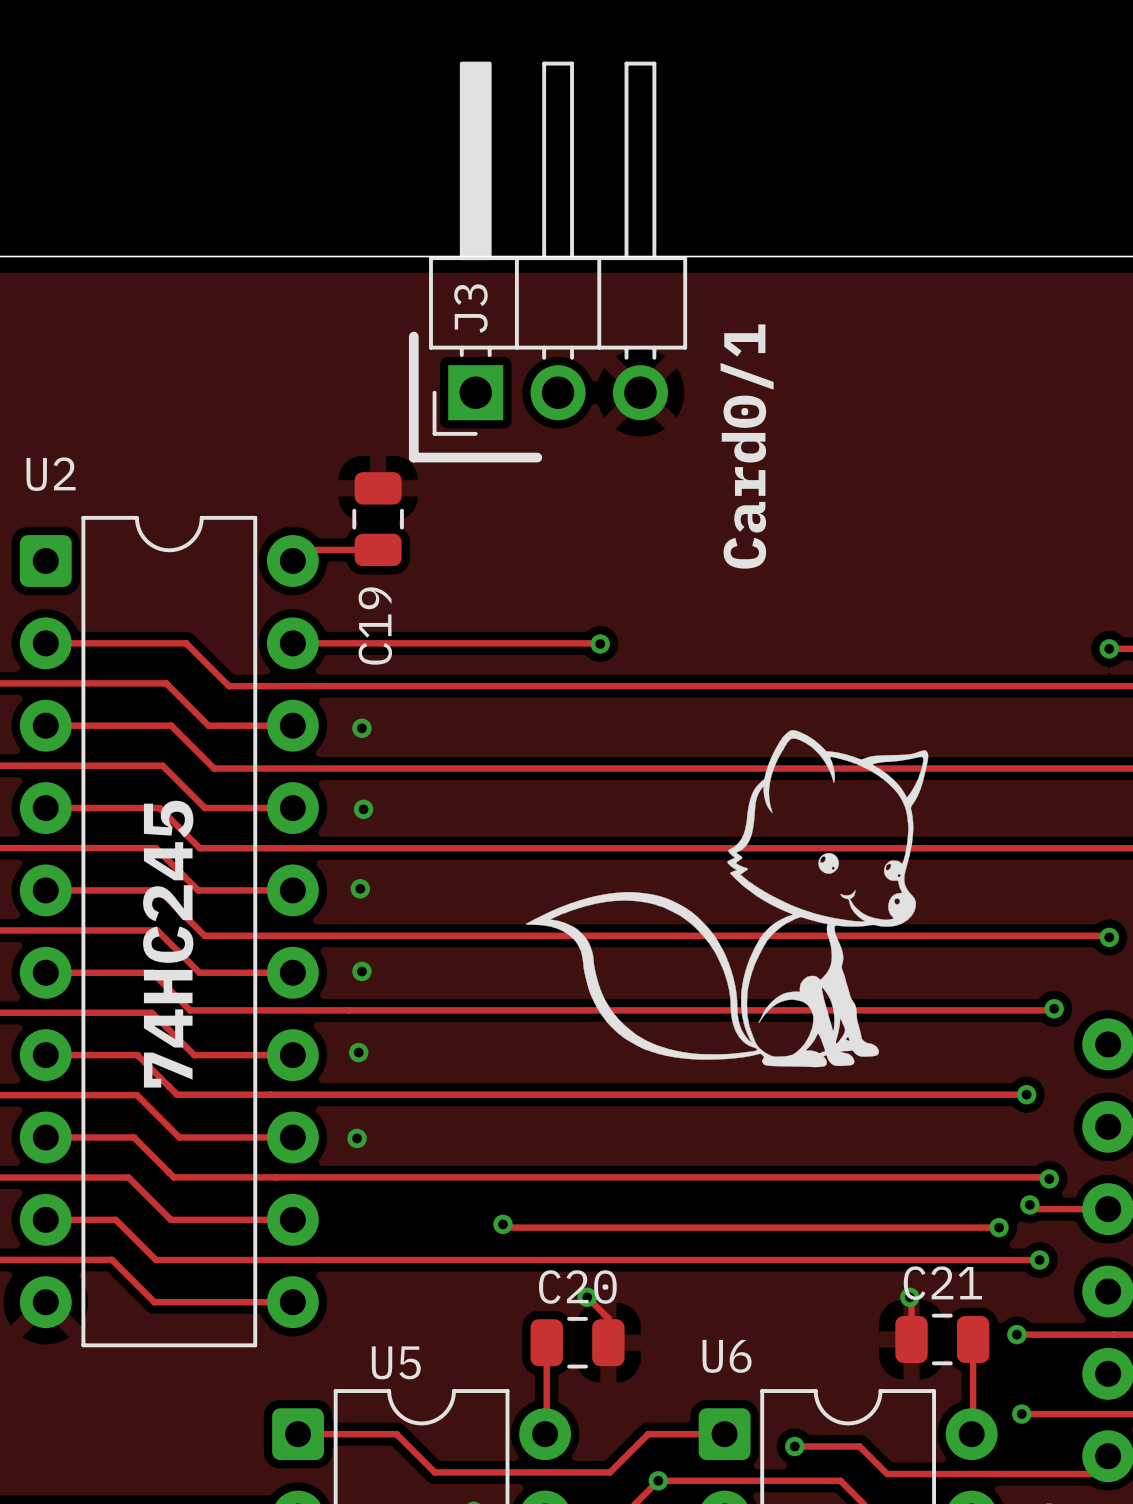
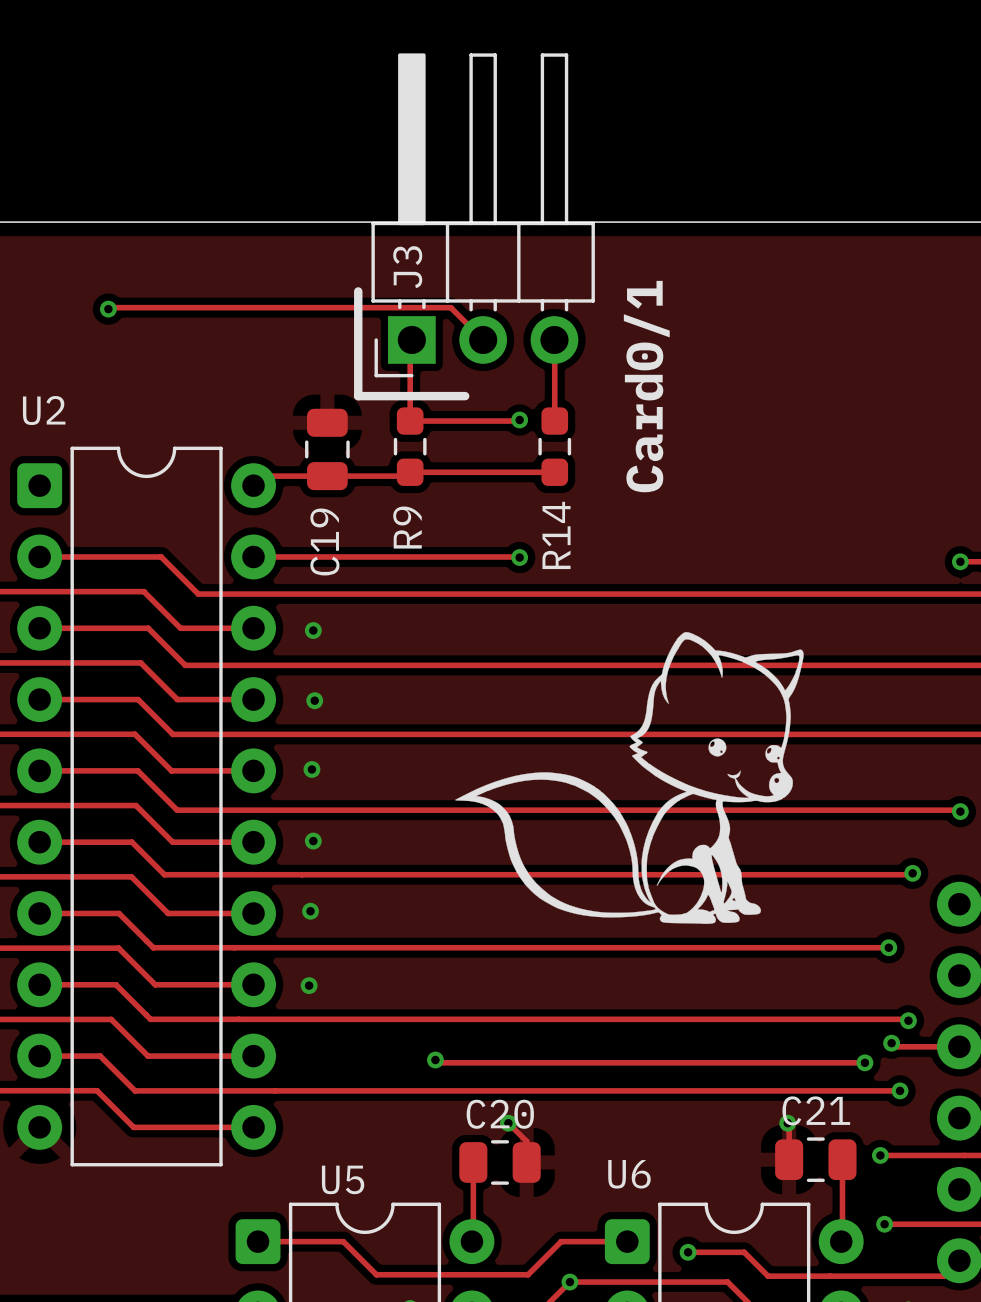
track: none -> (108, 309) (450, 307) (483, 339)
via: none -> (108, 309)
track: none -> (411, 339) (410, 341) (410, 421) (519, 419)
track: none -> (554, 340) (554, 421)
via: none -> (519, 419)
R9: none -> (410, 446)
R14: none -> (554, 446)
track: none -> (554, 472) (410, 472) (406, 476) (327, 476)
text: 74HC245 (168, 944) -> none

